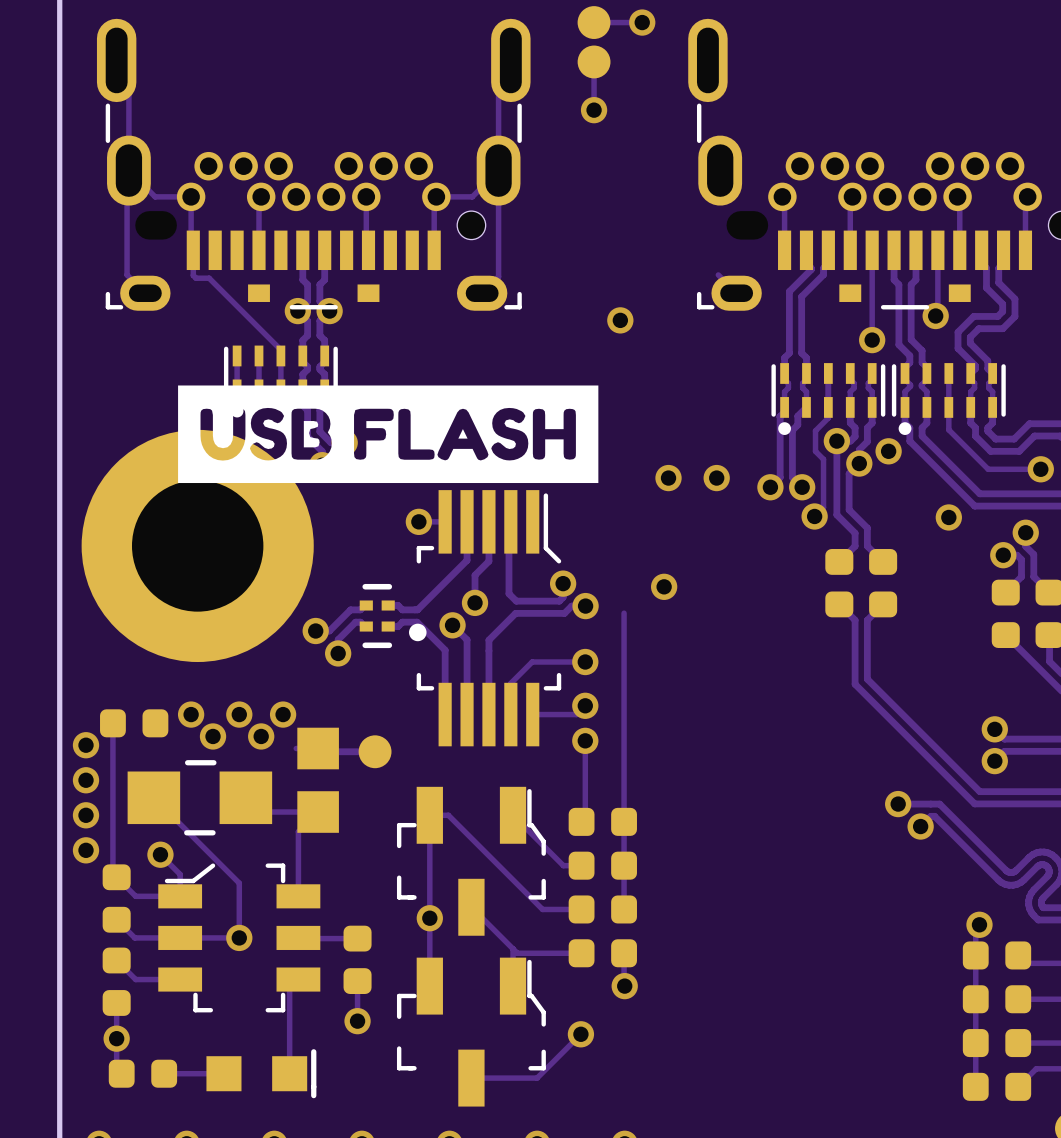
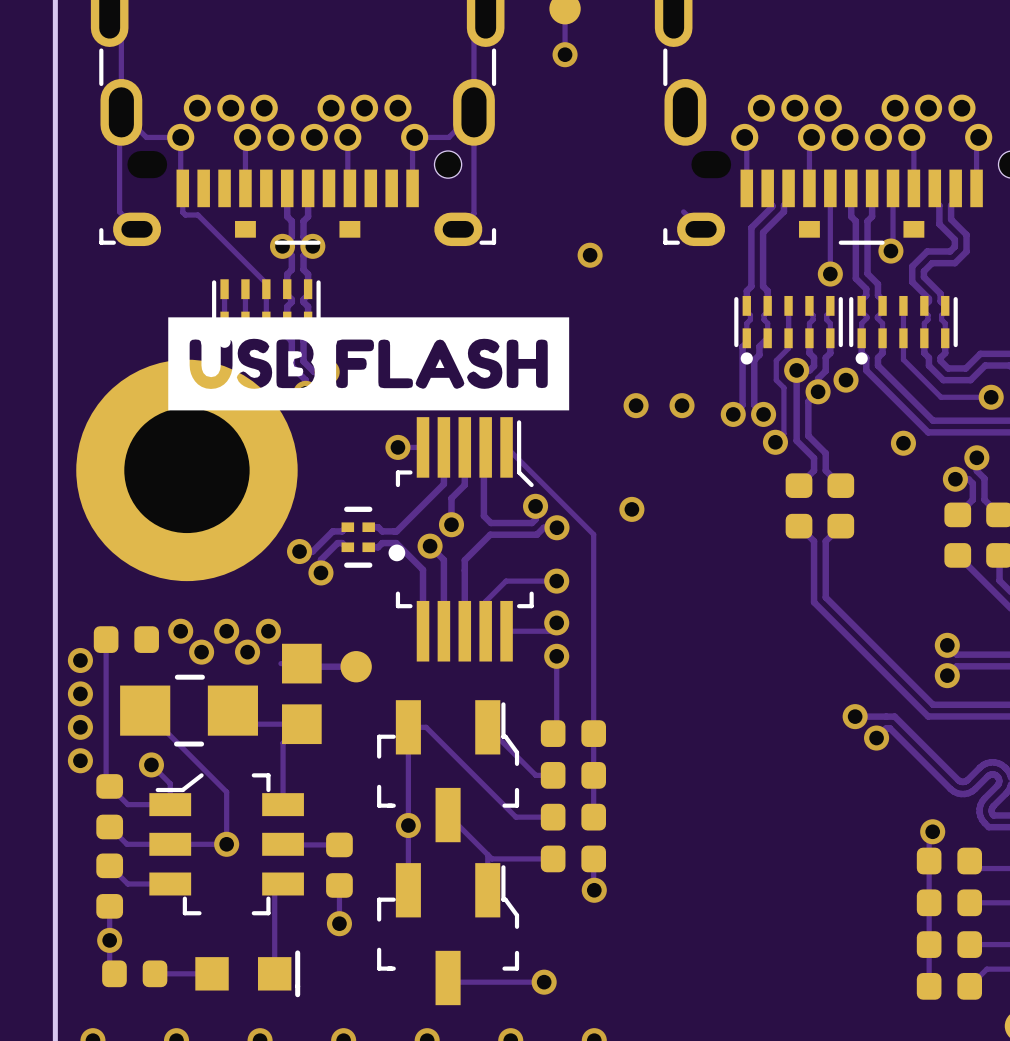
track: none -> (506, 447) (593, 534)
track: (580, 1034) (537, 1078) (471, 1078) -> (544, 982) (452, 982) (448, 977)
via position: (580, 1034) -> (544, 982)

